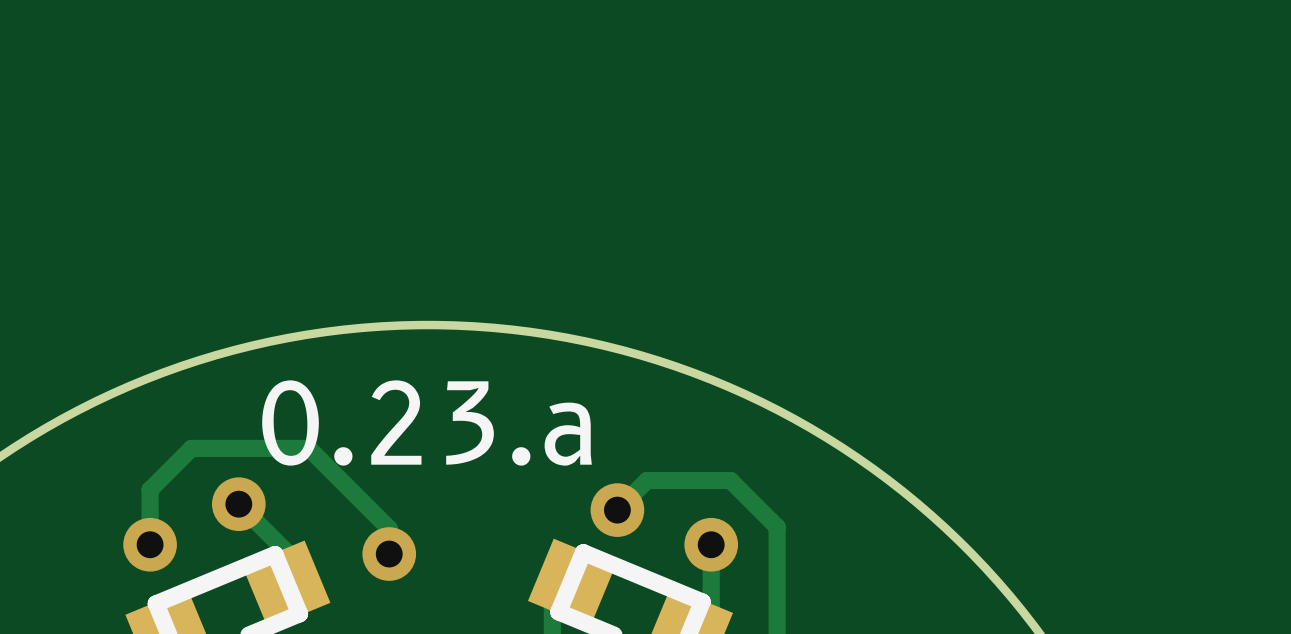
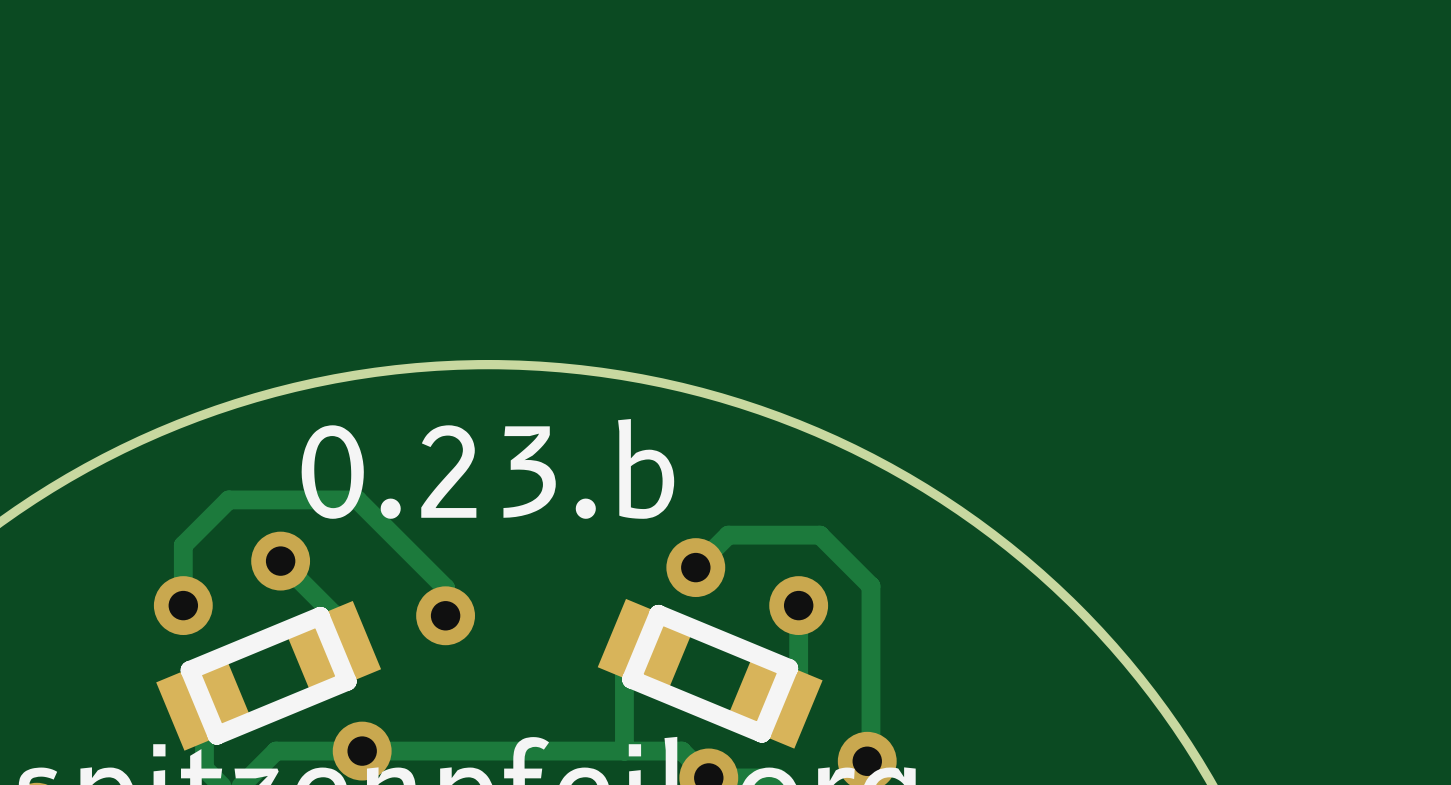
text: 0.23.a (427, 422) -> 0.23.b (487, 468)

